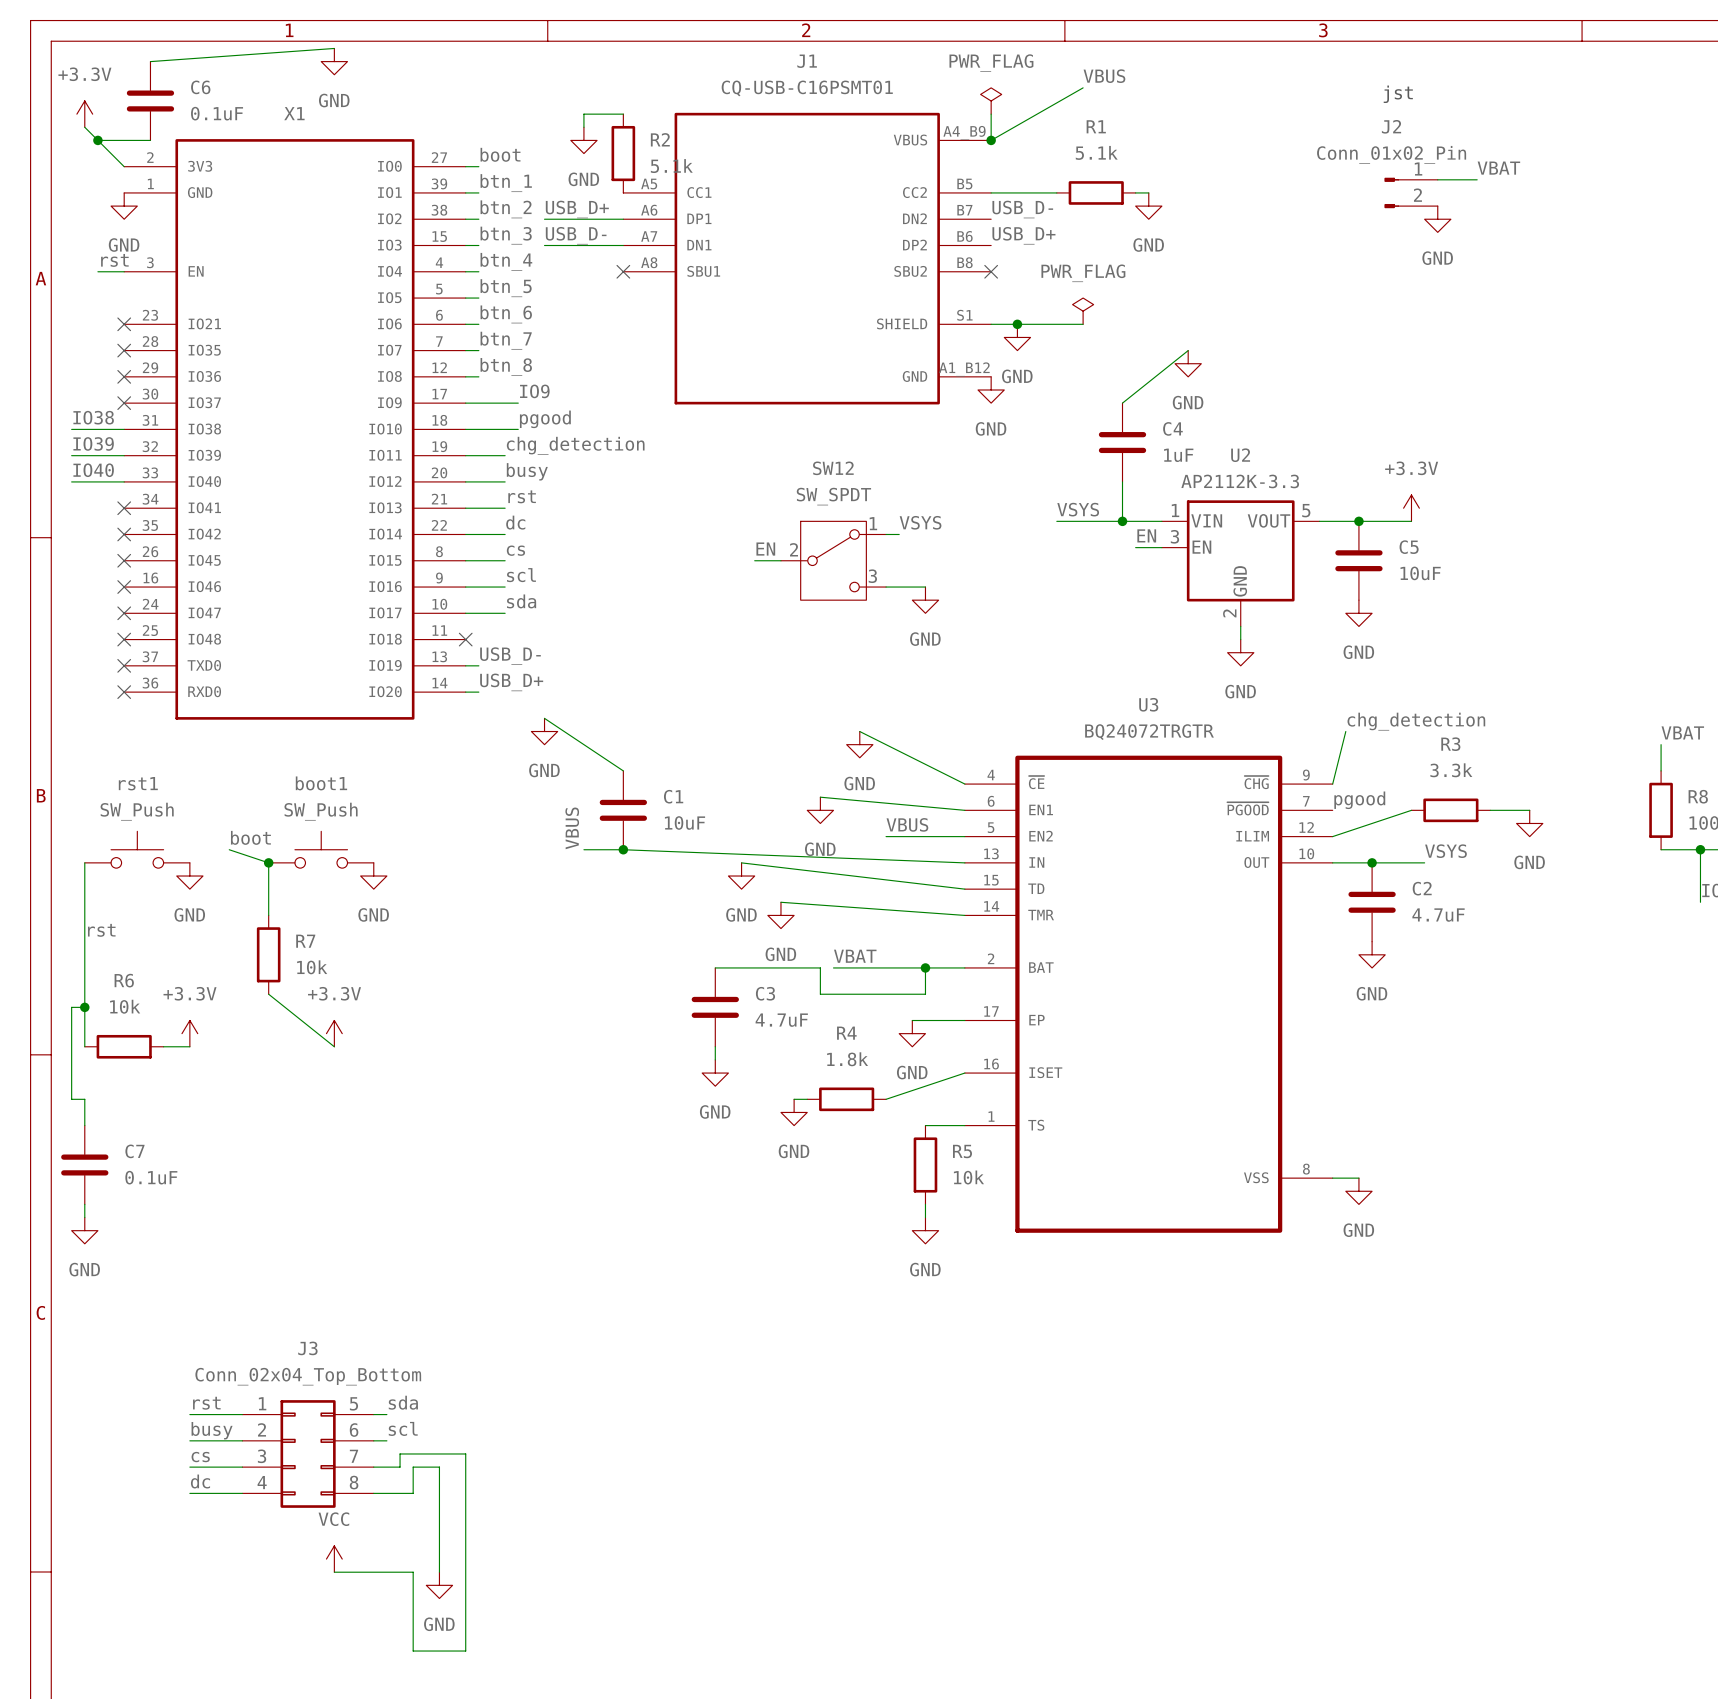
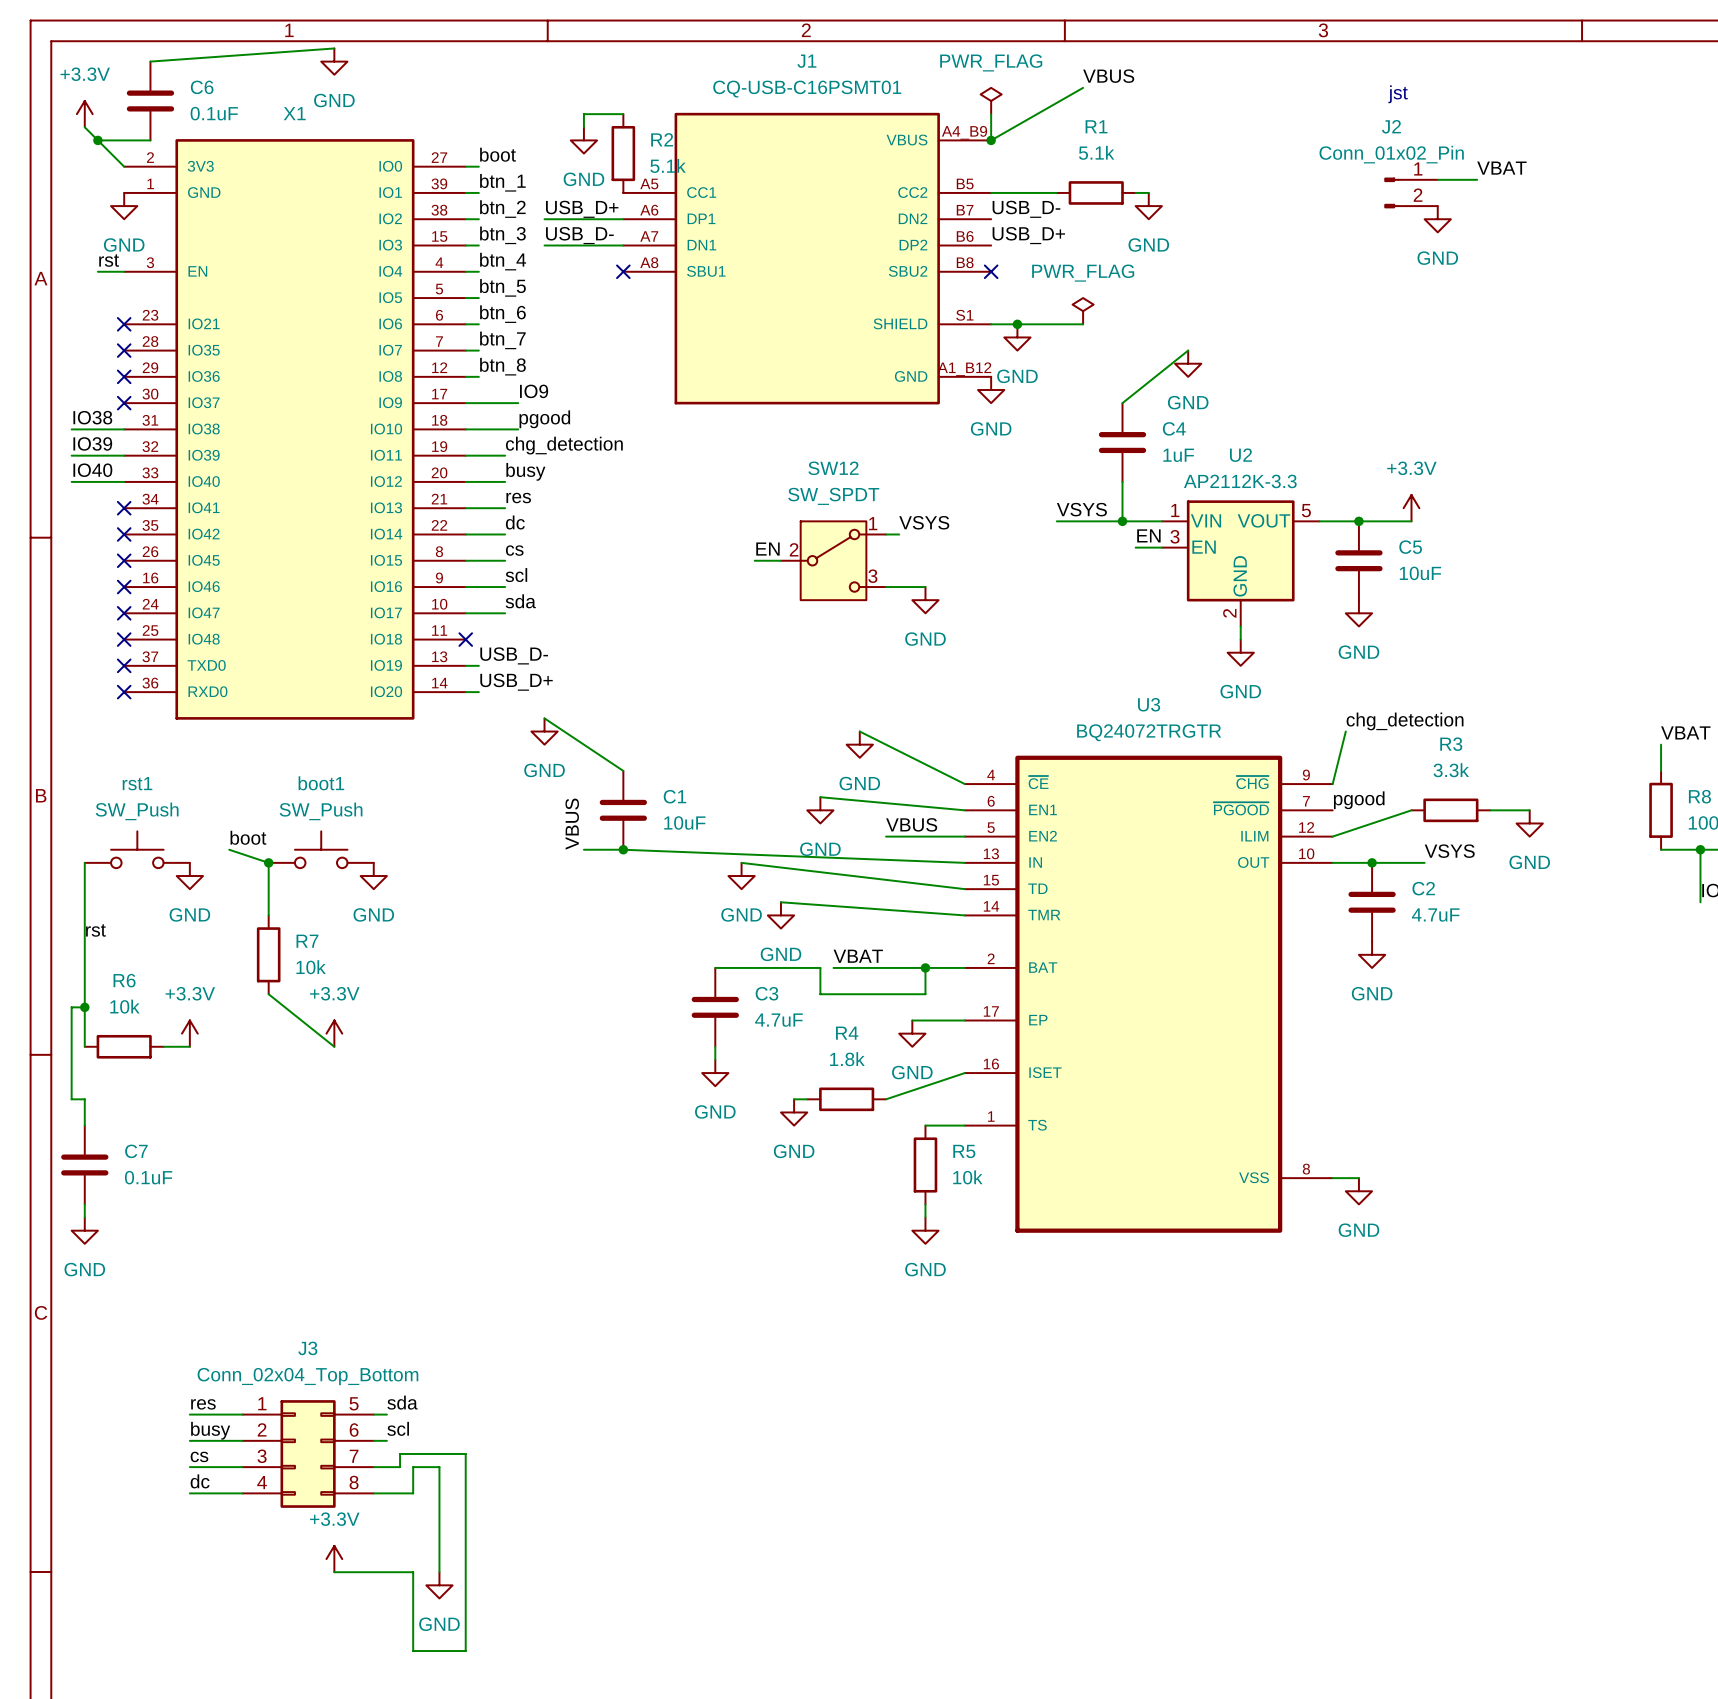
label: rst (522, 496) -> res (518, 498)
label: rst (206, 1403) -> res (203, 1404)
power symbol: VCC (334, 1559) -> +3.3V (334, 1559)

